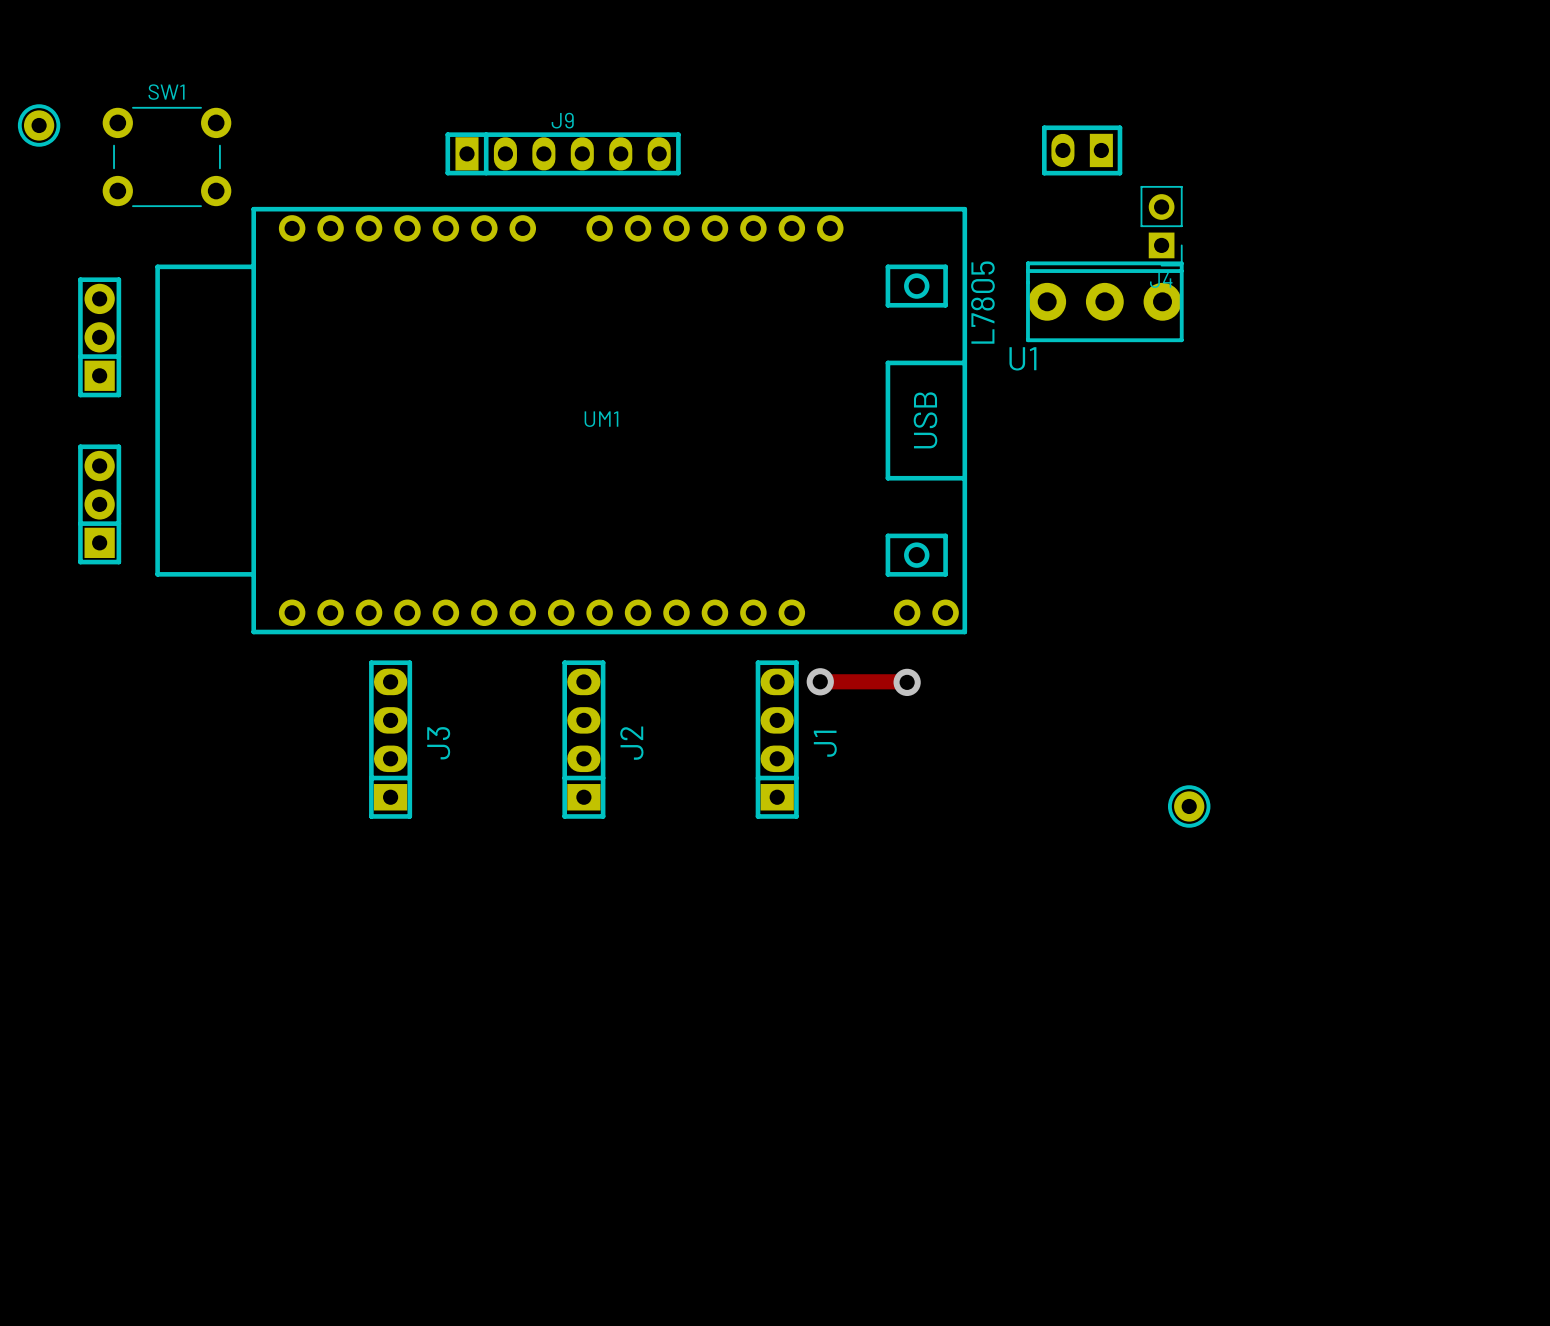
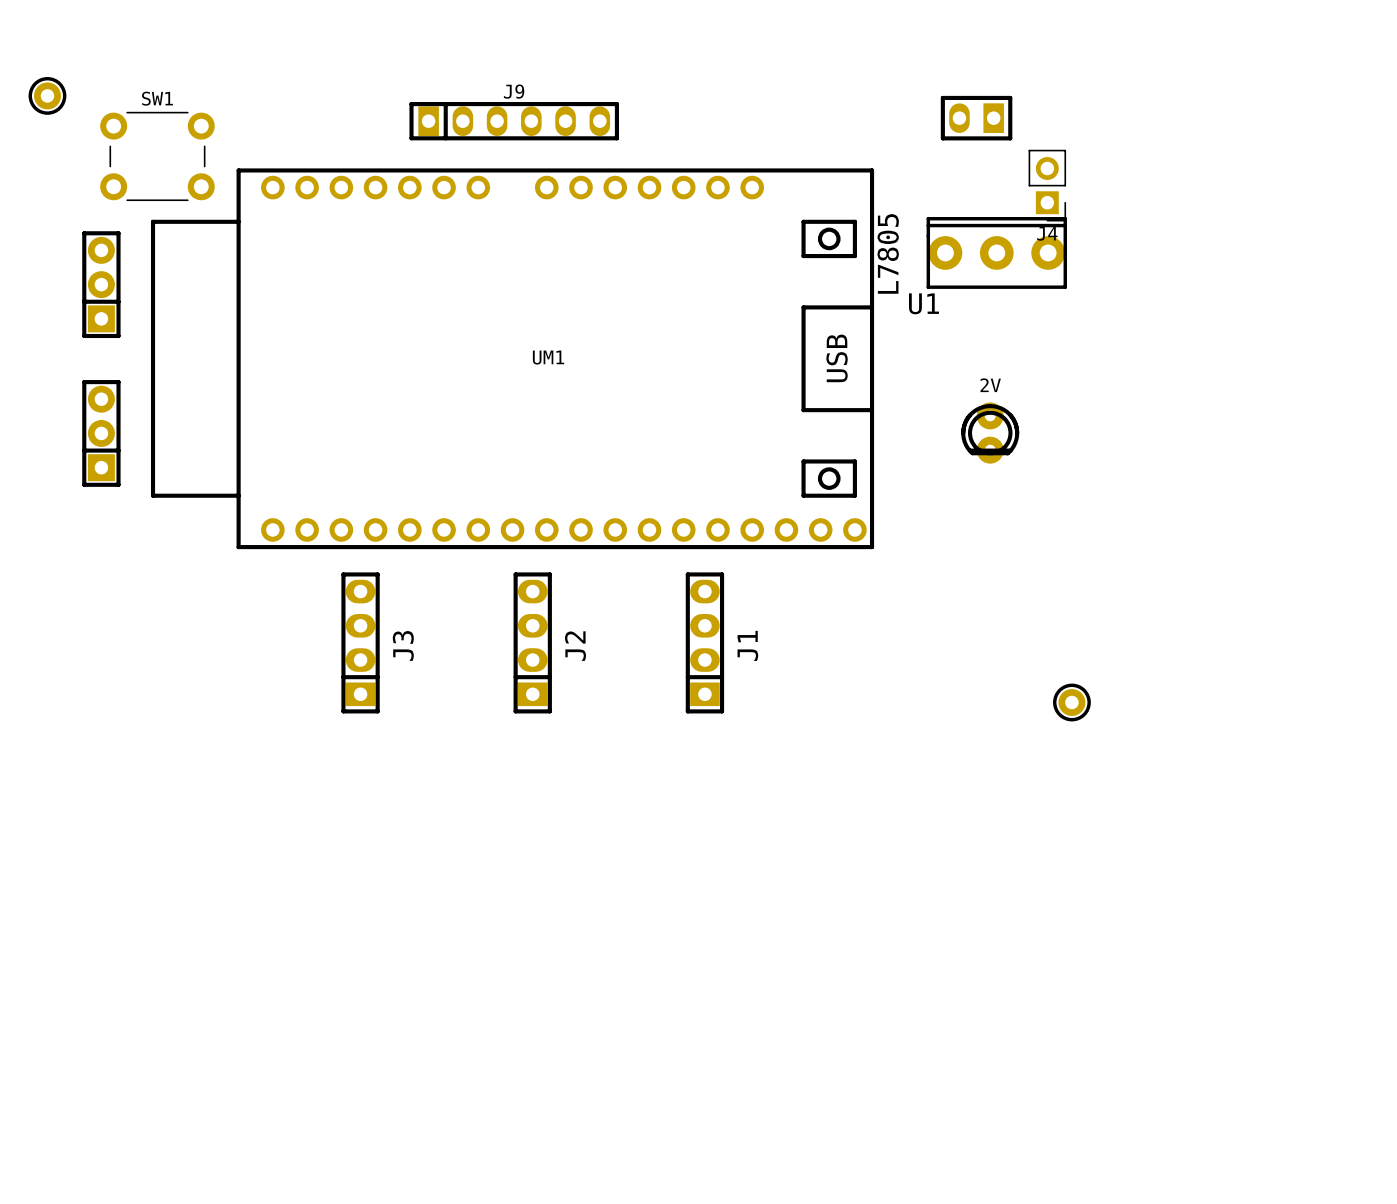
SW1 position: (166, 156) -> (157, 156)
UM1 footprint: [155, 206, 968, 635] -> [150, 168, 875, 550]
part: none -> 2V (990, 433)
track: (820, 681) (907, 682) -> none
via: (820, 681) -> none
via: (907, 682) -> none

